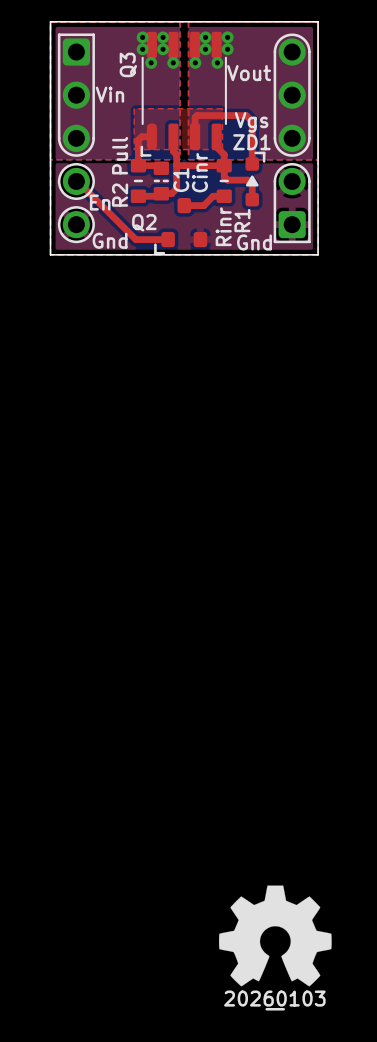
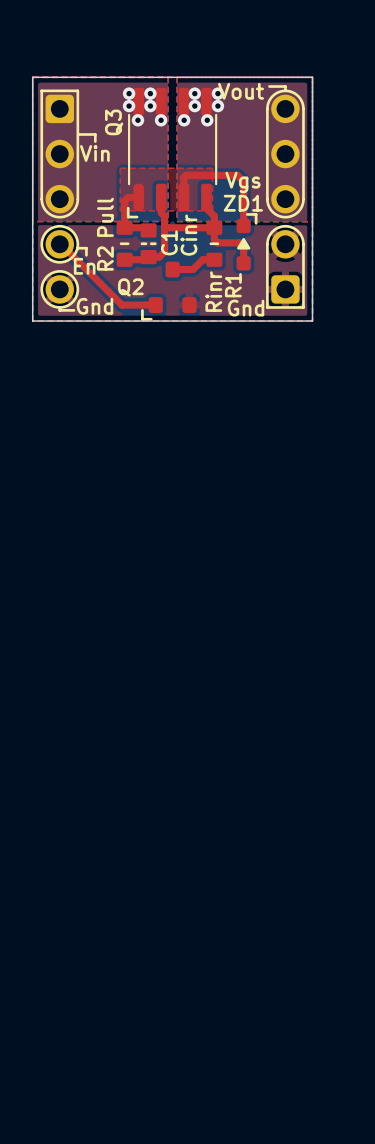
line: none -> (269, 86) (285, 86) (285, 90)
text position: Vout (249, 73) -> Vout (241, 91)
line: none -> (79, 134) (95, 134) (95, 141)
line: none -> (77, 248) (86, 248) (86, 255)
line: none -> (59, 307) (59, 310) (74, 310)
drawing: [219, 885, 332, 1011] -> none

